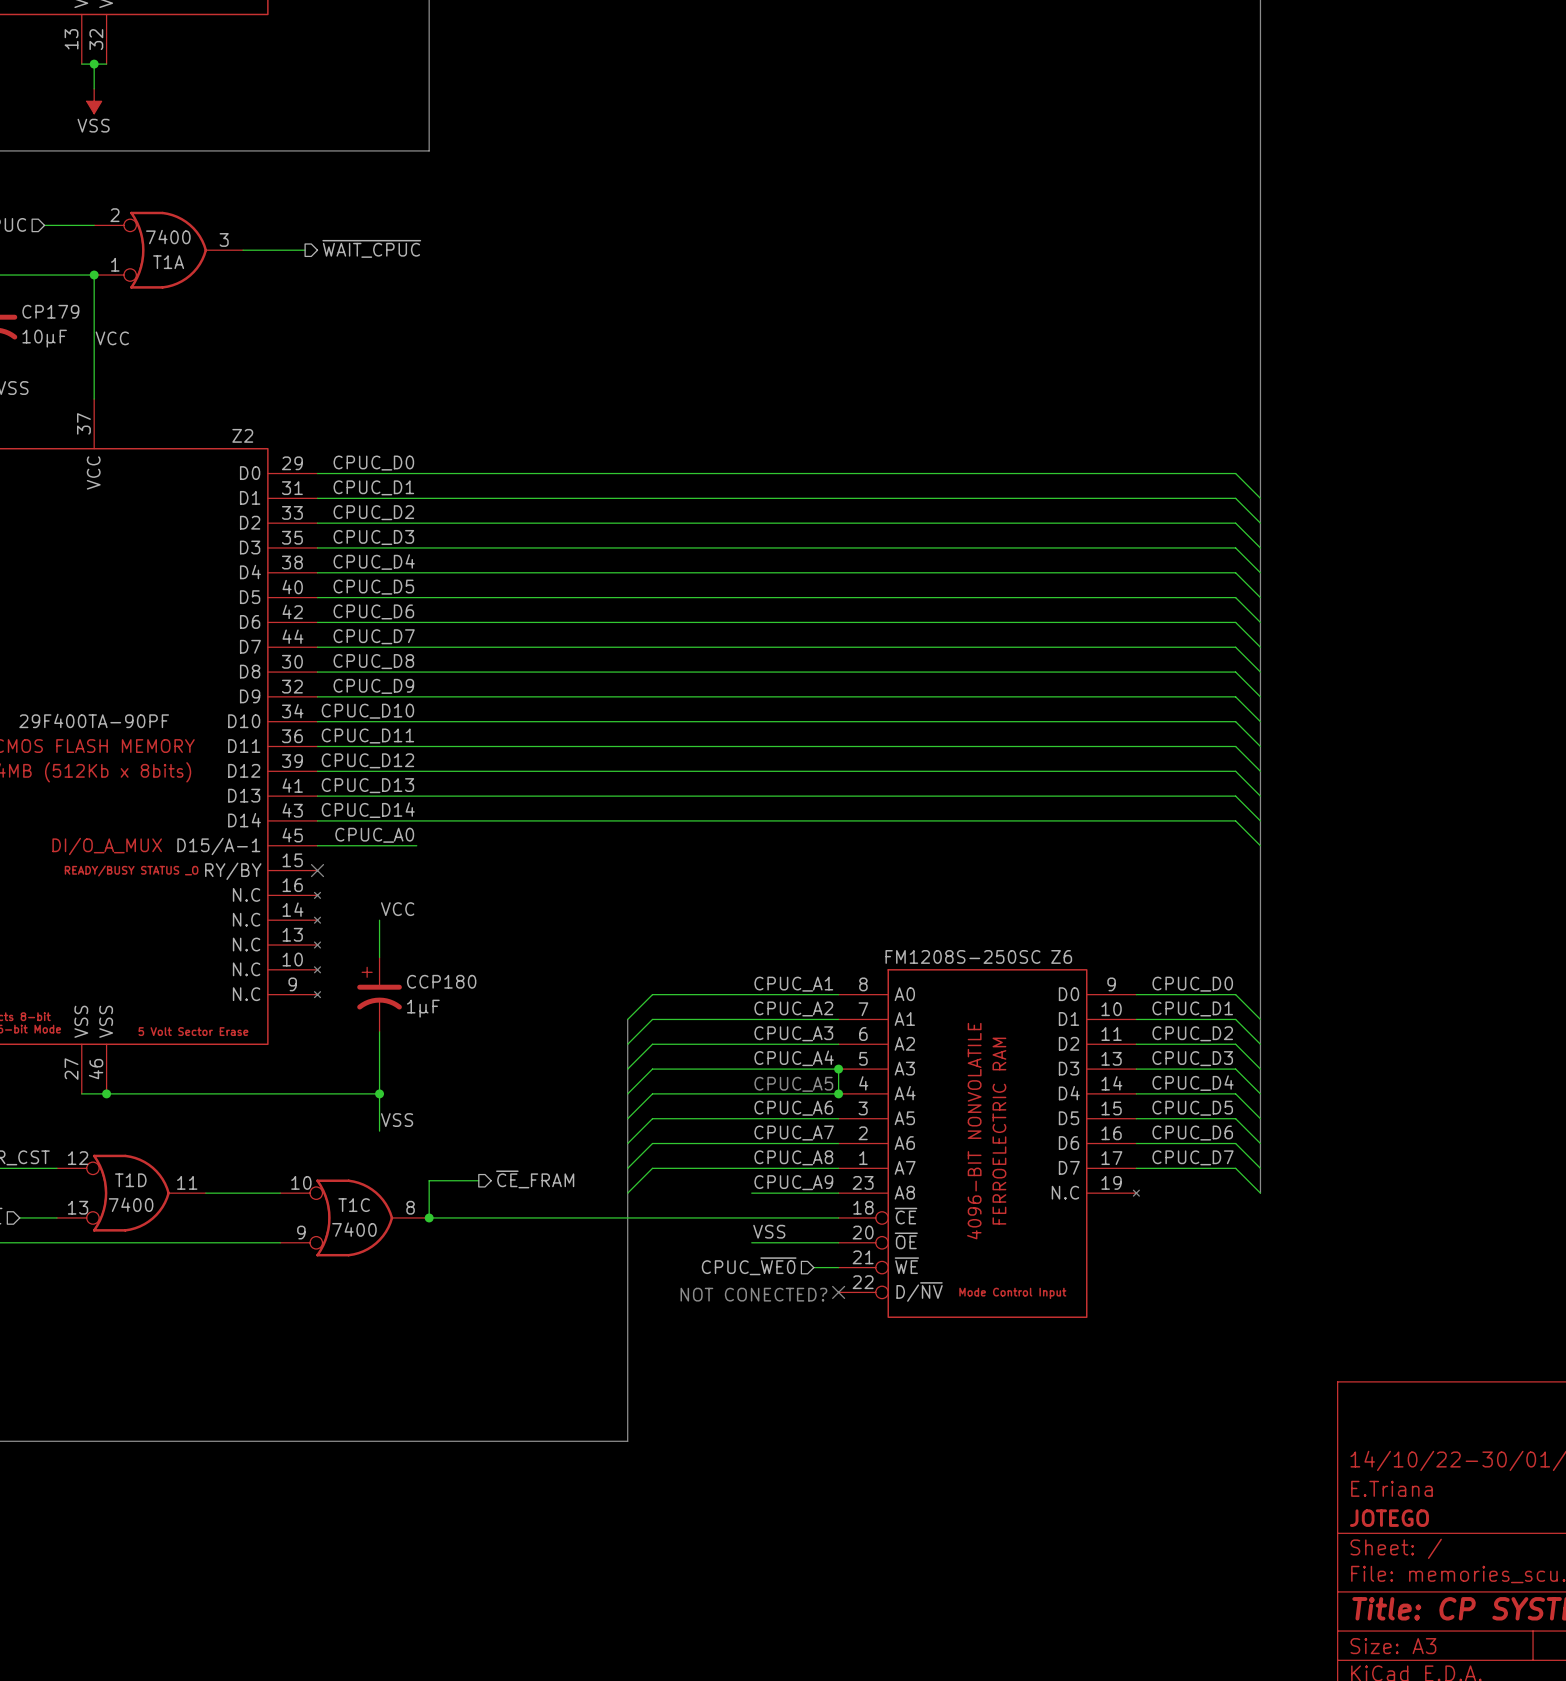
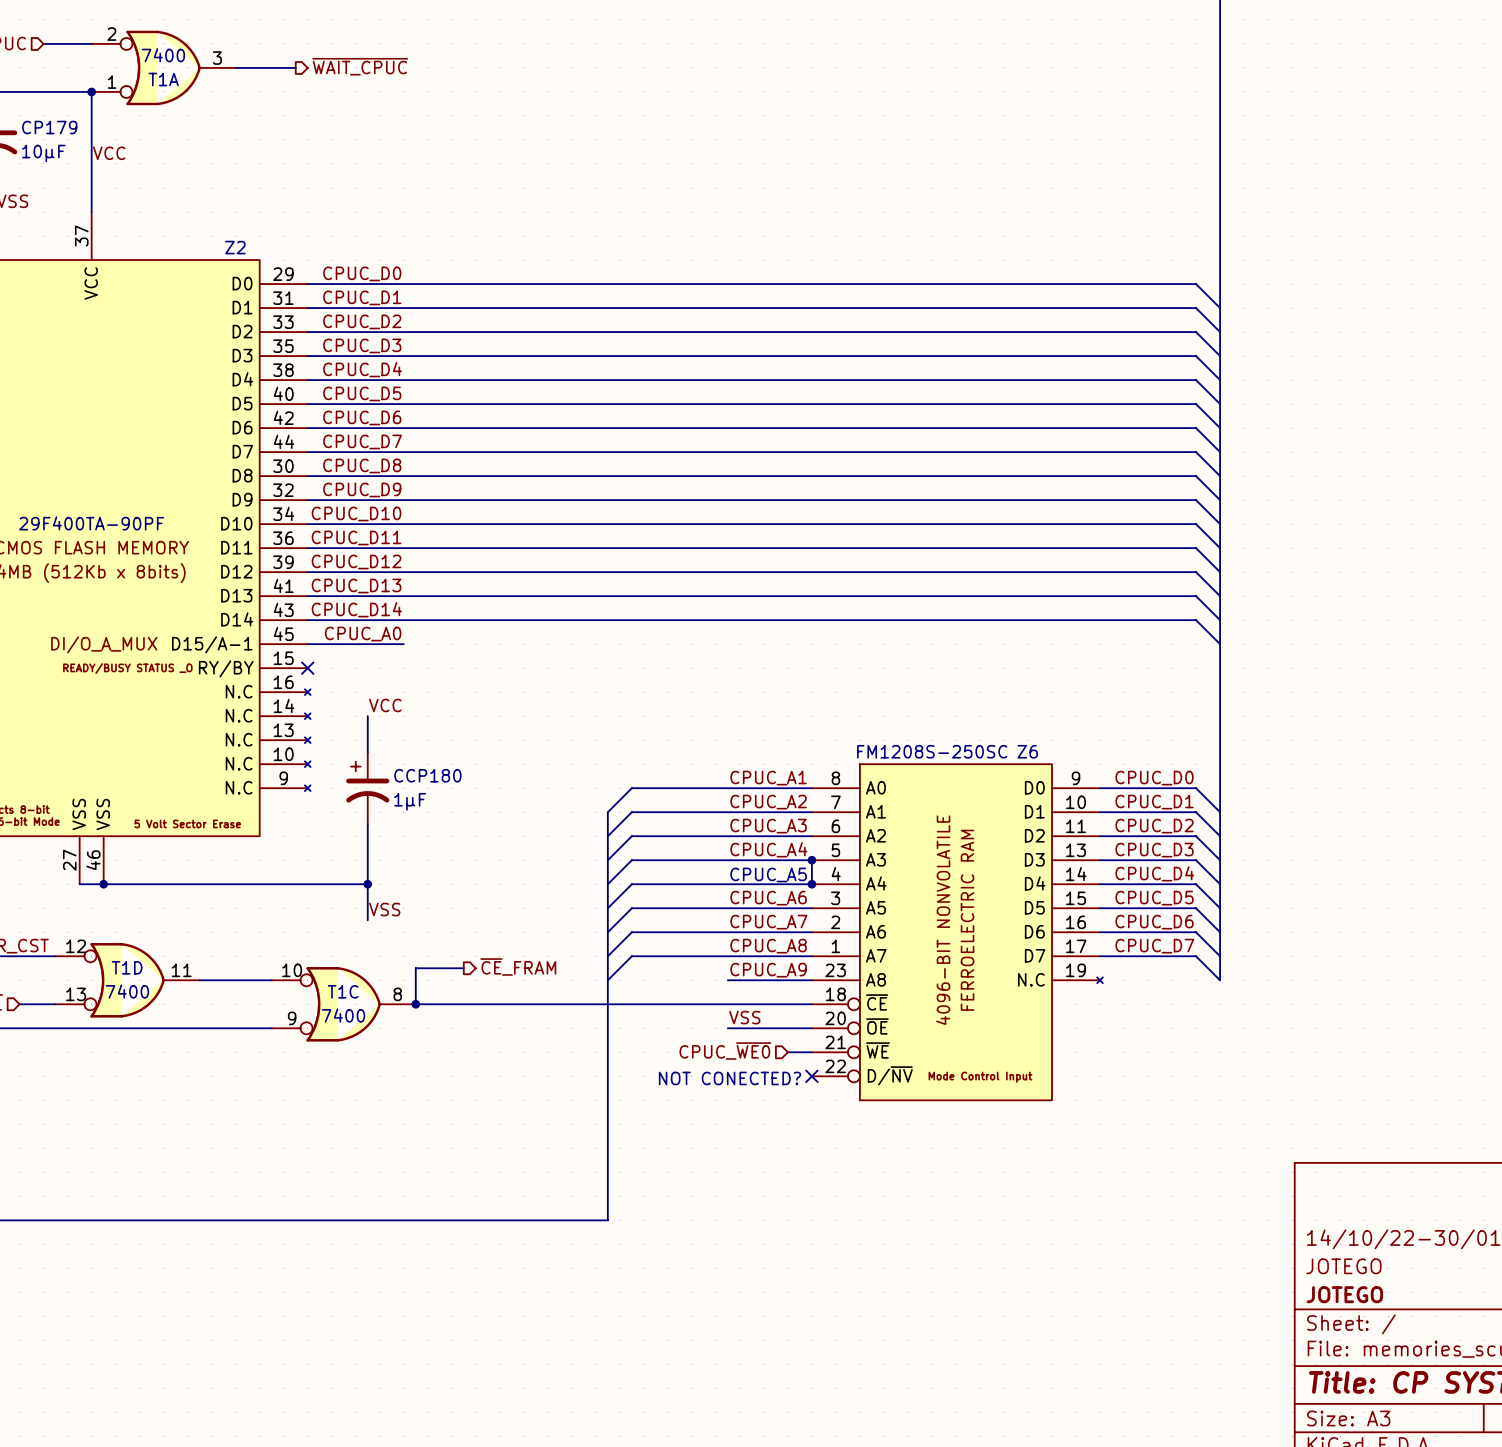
title block: E.Triana (1392, 1488) -> JOTEGO (1343, 1266)

